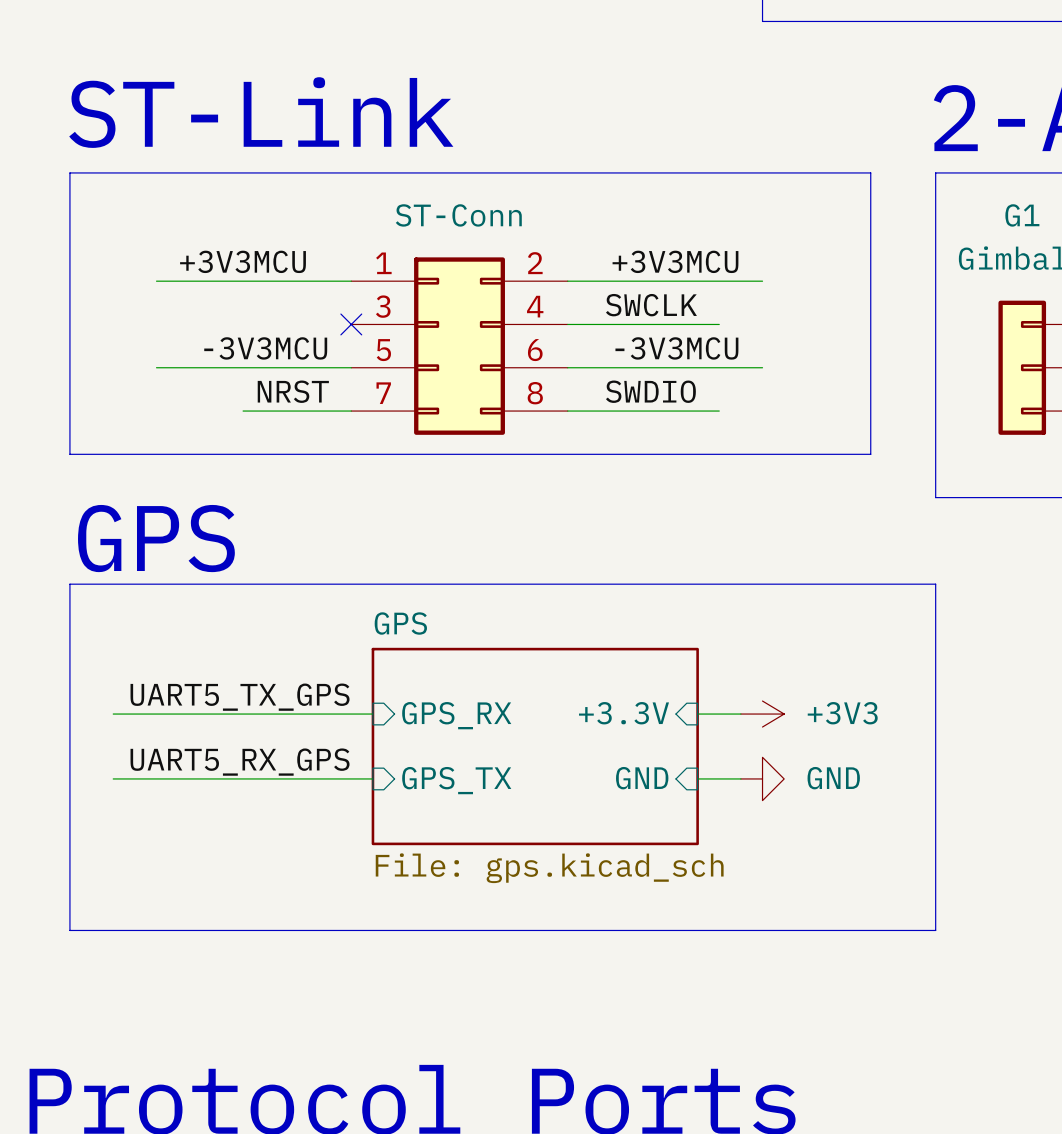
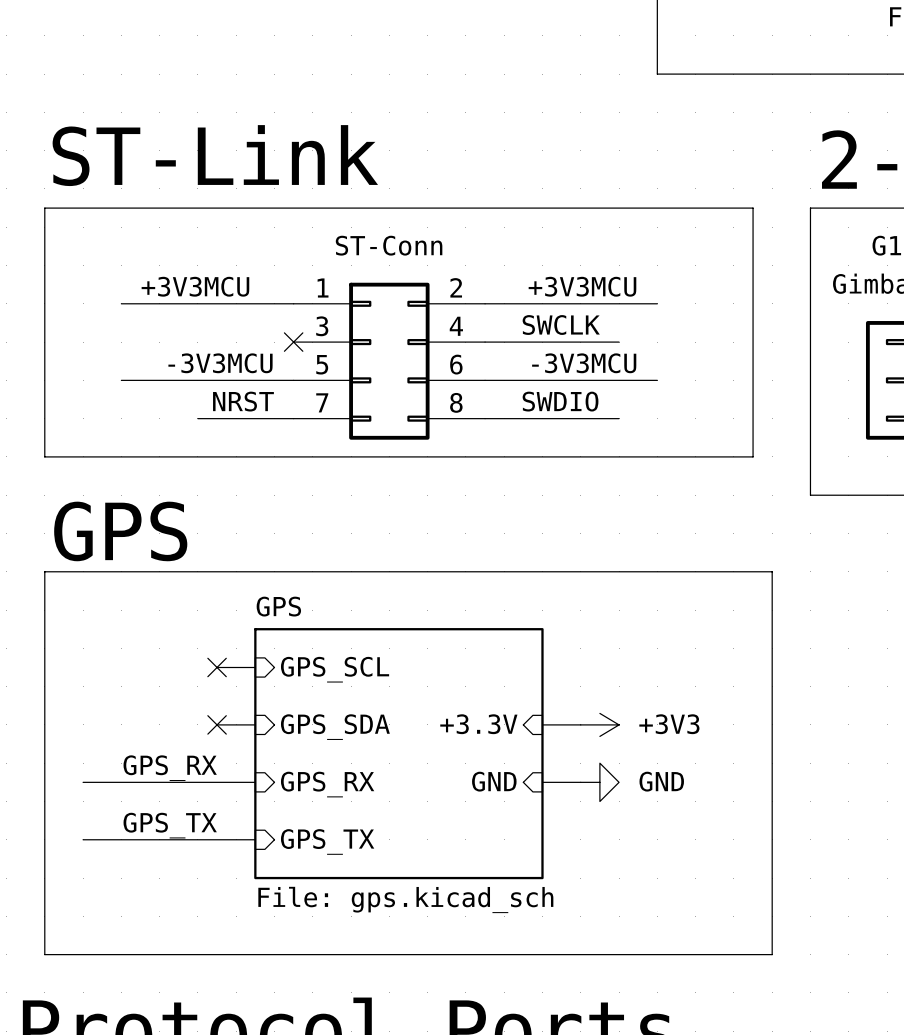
line: (892, 584) (935, 584) (935, 930) (69, 930) -> (772, 571) (772, 954) (44, 954) (44, 878)
wire: none -> (217, 667) (255, 667)
no-connect mark: none -> (217, 667)
sheet pin: none -> GPS_SCL (335, 669)
label: UART5_TX_GPS (240, 697) -> none
sheet pin position: +3.3V (624, 713) -> +3.3V (478, 724)
wire: (113, 714) (372, 714) -> none
wire: (697, 714) (740, 714) -> (542, 724) (580, 724)
power symbol position: +3V3 (762, 714) -> +3V3 (599, 724)
sheet pin position: GPS_RX (456, 715) -> GPS_RX (327, 784)
sheet GPS: File: gps.kicad_sch (535, 746) -> none
wire: none -> (217, 724) (255, 724)
no-connect mark: none -> (217, 724)
sheet pin: none -> GPS_SDA (335, 727)
label: UART5_RX_GPS (240, 762) -> none
wire: (113, 778) (372, 778) -> none
sheet pin position: GND (642, 778) -> GND (494, 781)
wire: (697, 778) (740, 778) -> (542, 782) (580, 782)
power symbol position: GND (762, 778) -> GND (599, 782)
sheet pin position: GPS_TX (456, 780) -> GPS_TX (327, 841)
sheet GPS: none -> File: gps.kicad_sch (398, 753)
label: none -> GPS_RX (170, 768)
wire: none -> (83, 782) (255, 782)
label: none -> GPS_TX (170, 825)
wire: none -> (83, 839) (255, 839)

